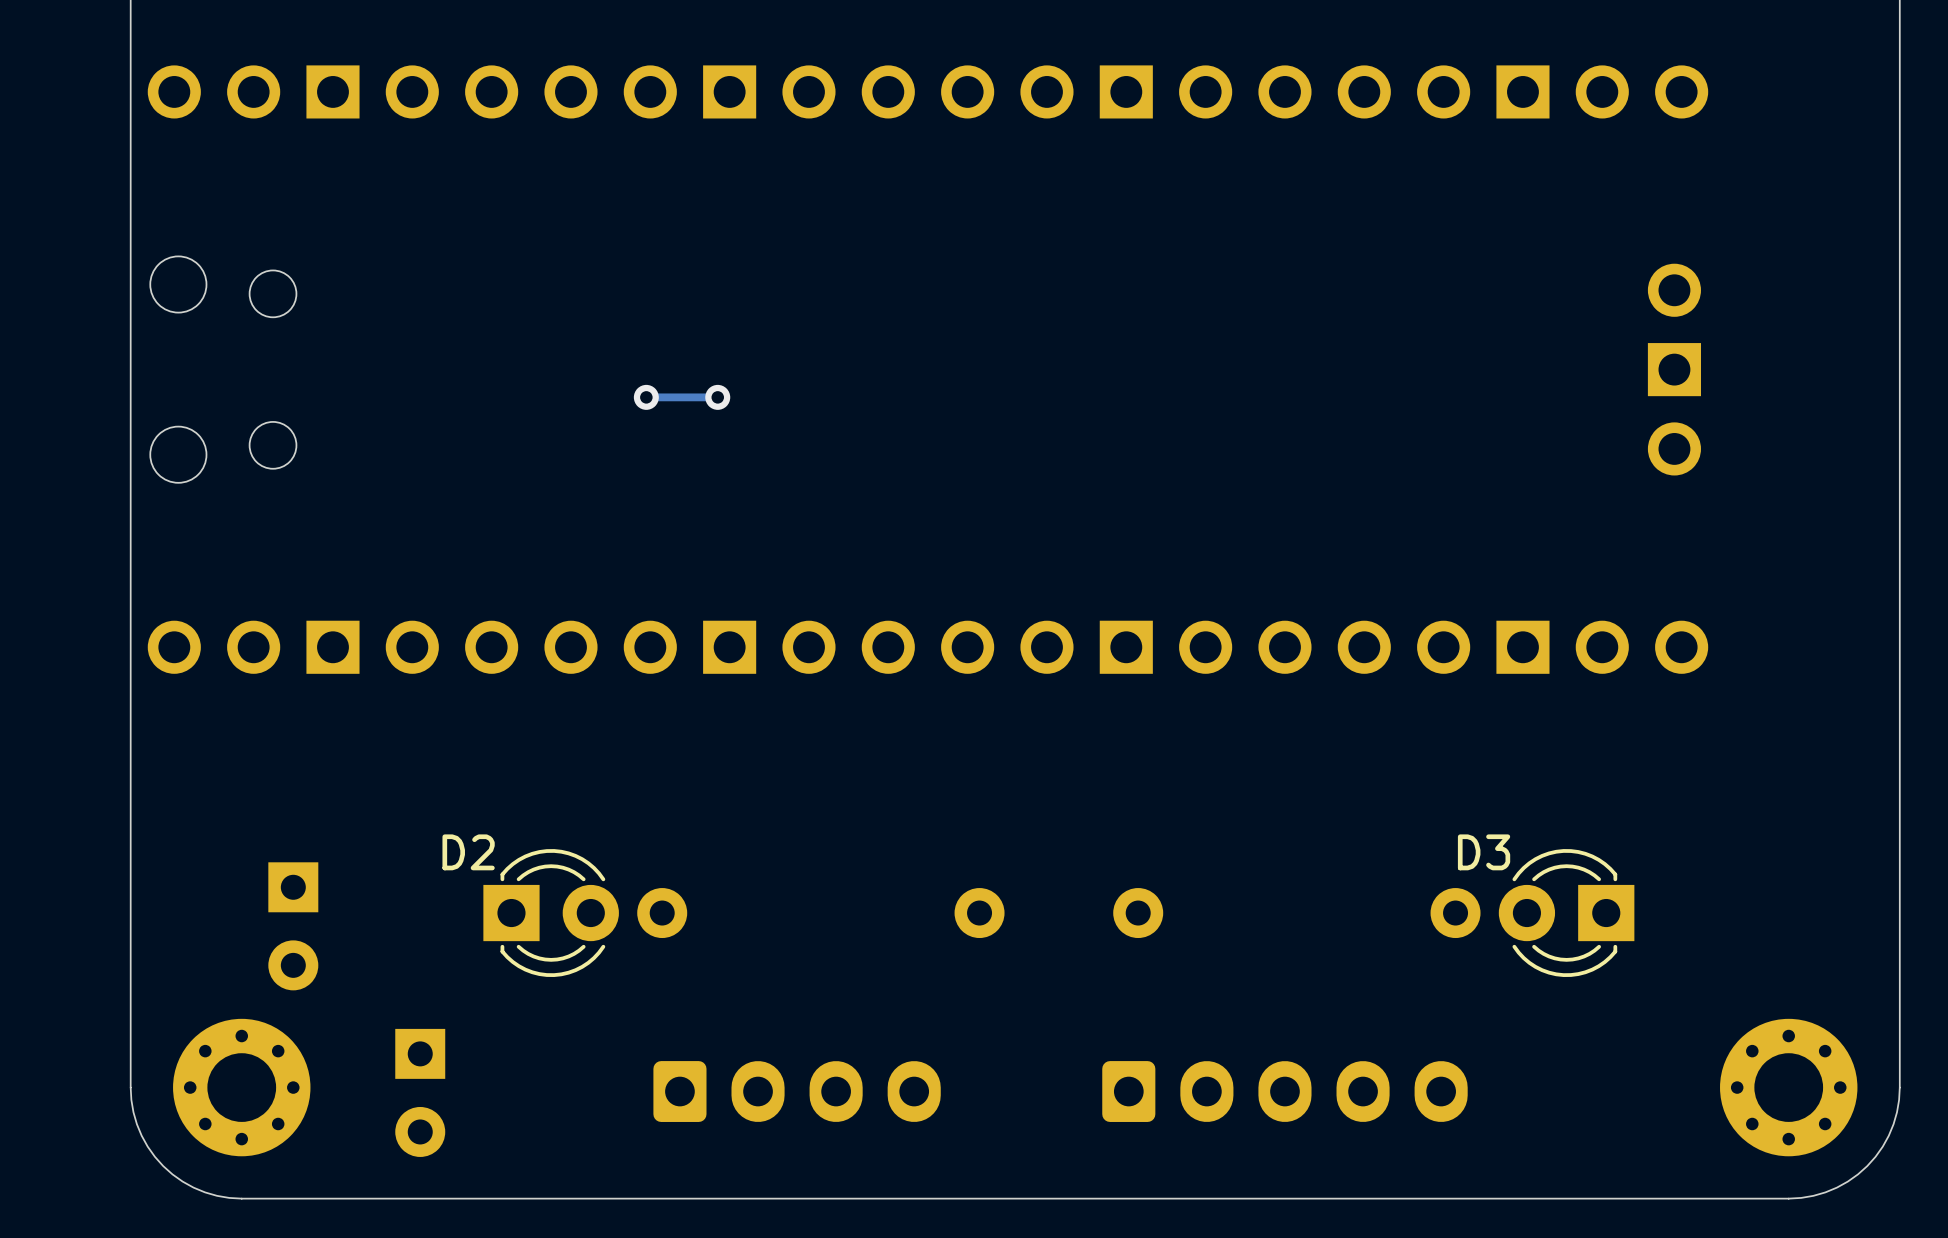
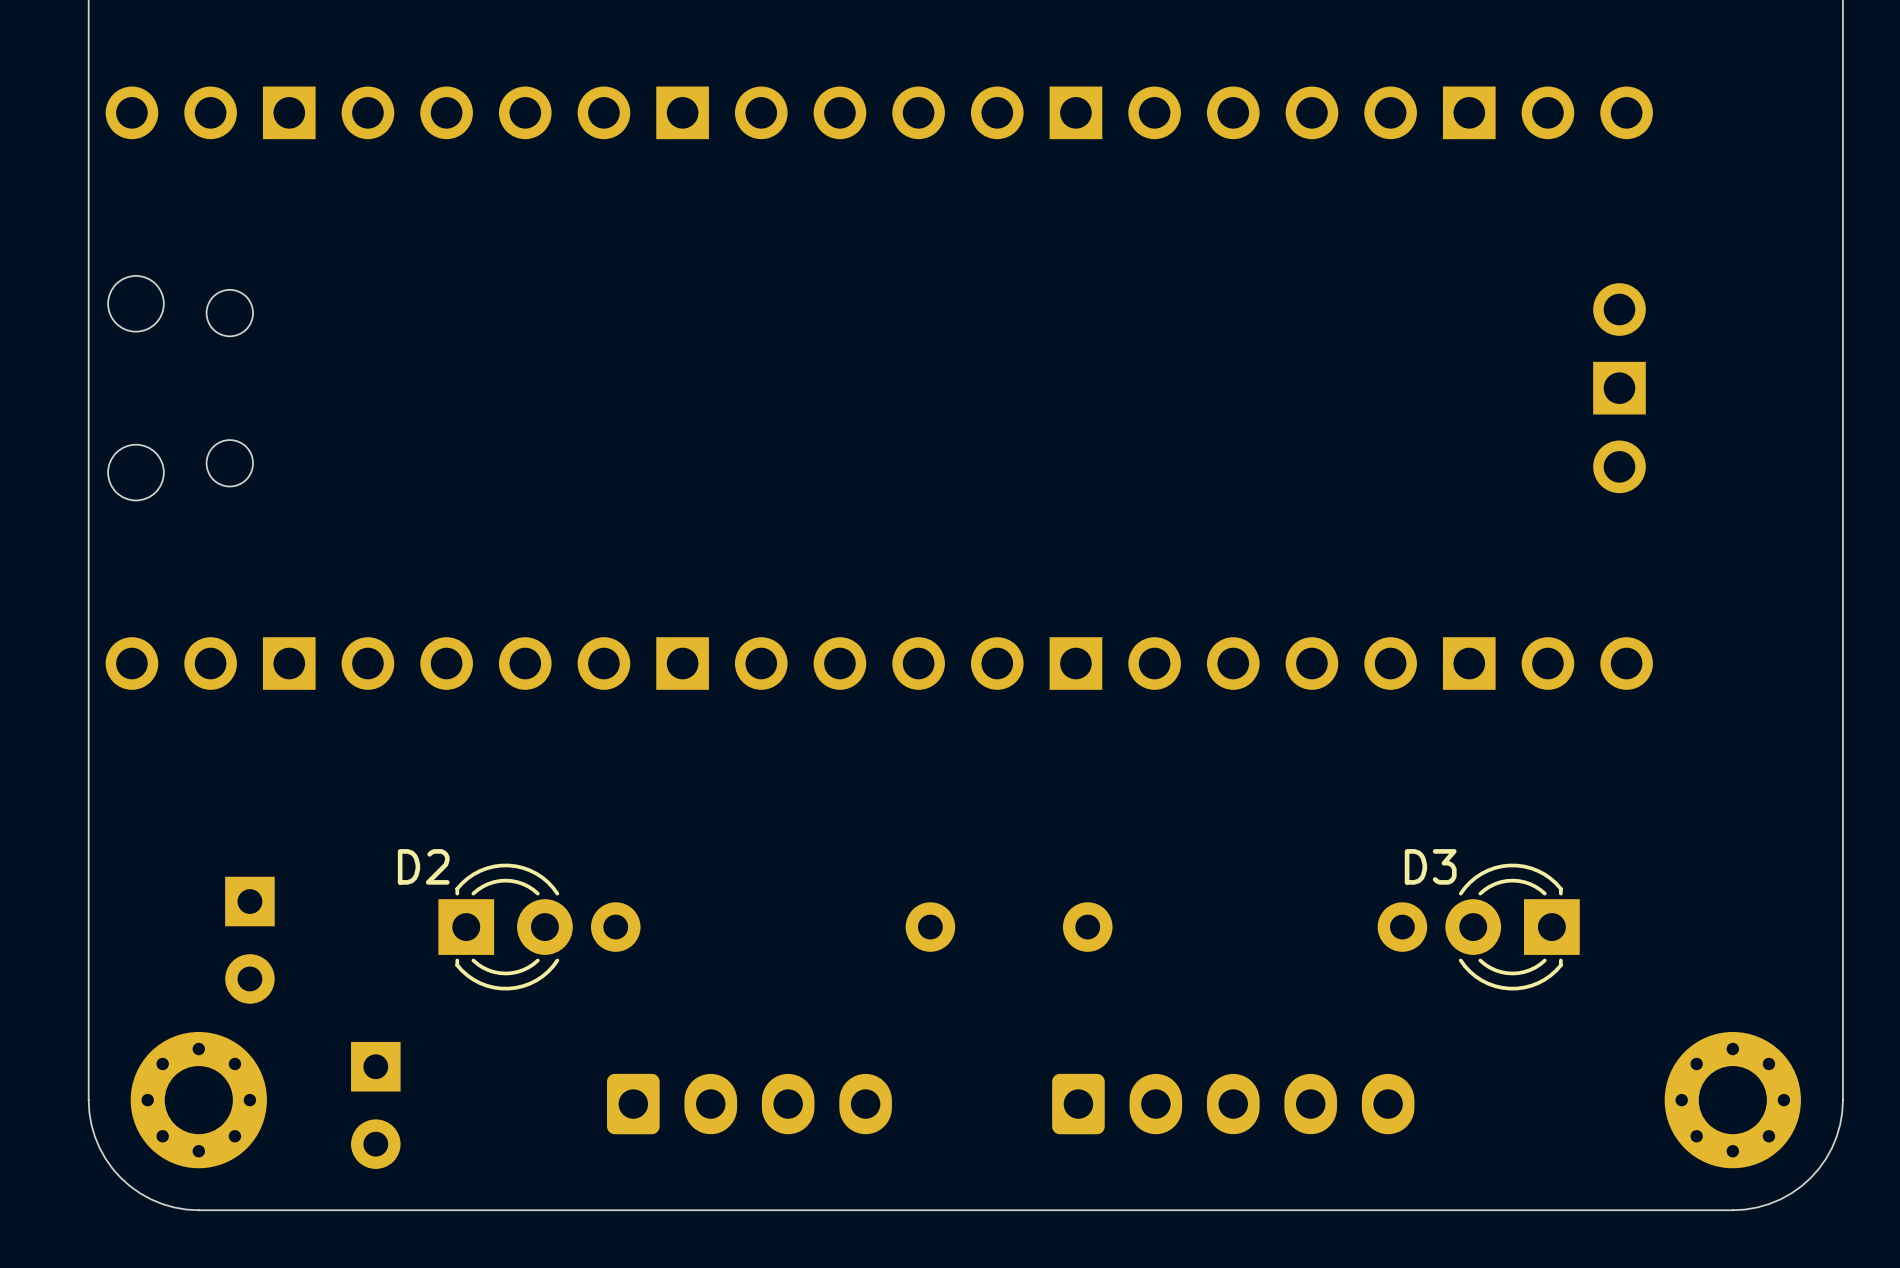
via: (646, 397) -> none
track: (717, 397) (646, 397) -> none
via: (717, 397) -> none

